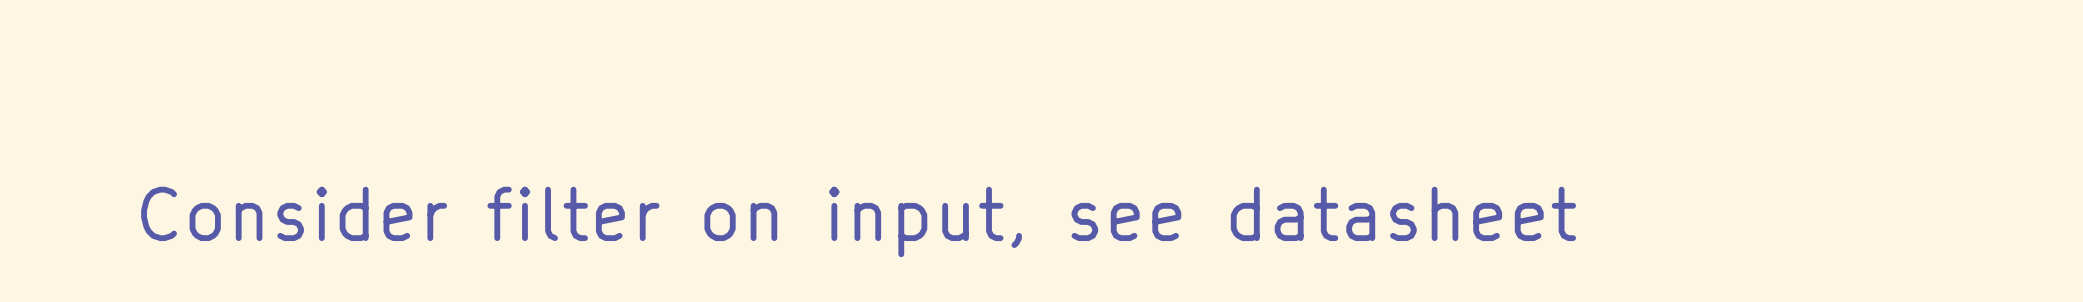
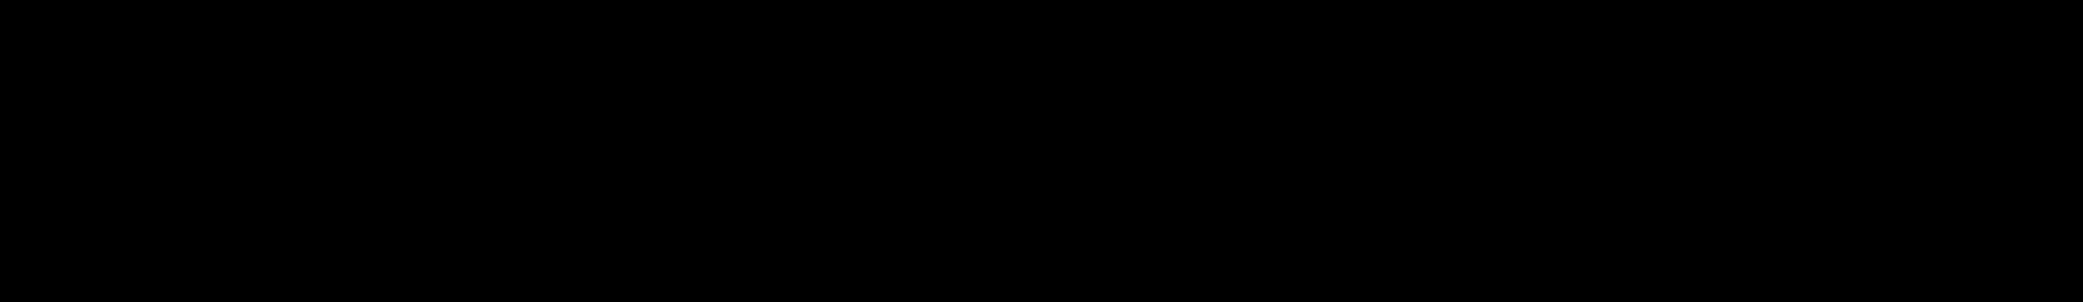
text: Consider filter on input, see datasheet (858, 221) -> none

